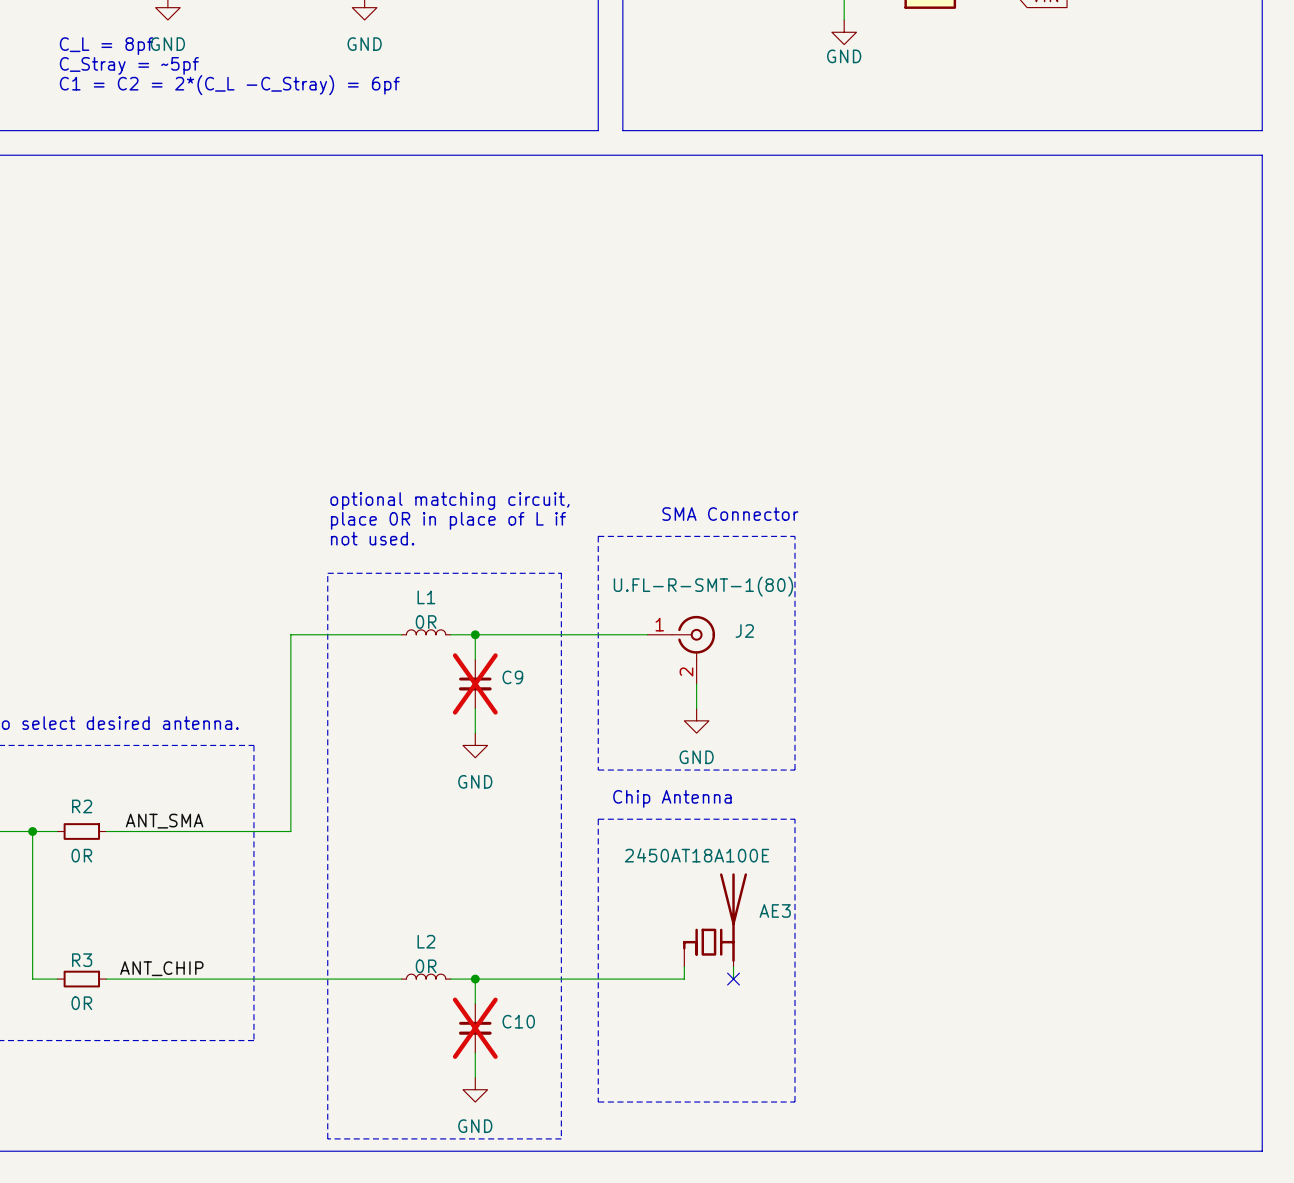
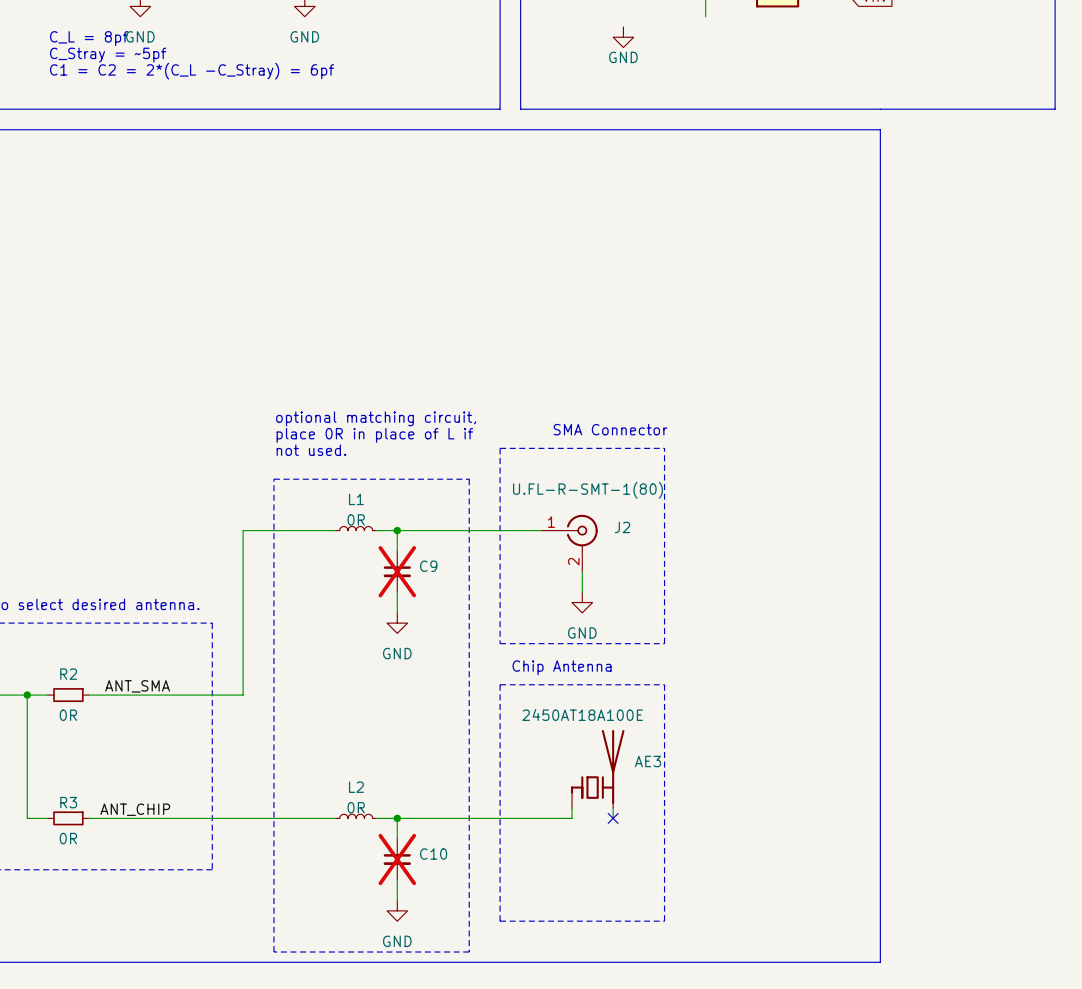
power symbol position: GND (844, 32) -> GND (623, 37)
line: (1053, 155) (1262, 155) (1262, 1151) (1053, 1151) -> (880, 129) (880, 962)

